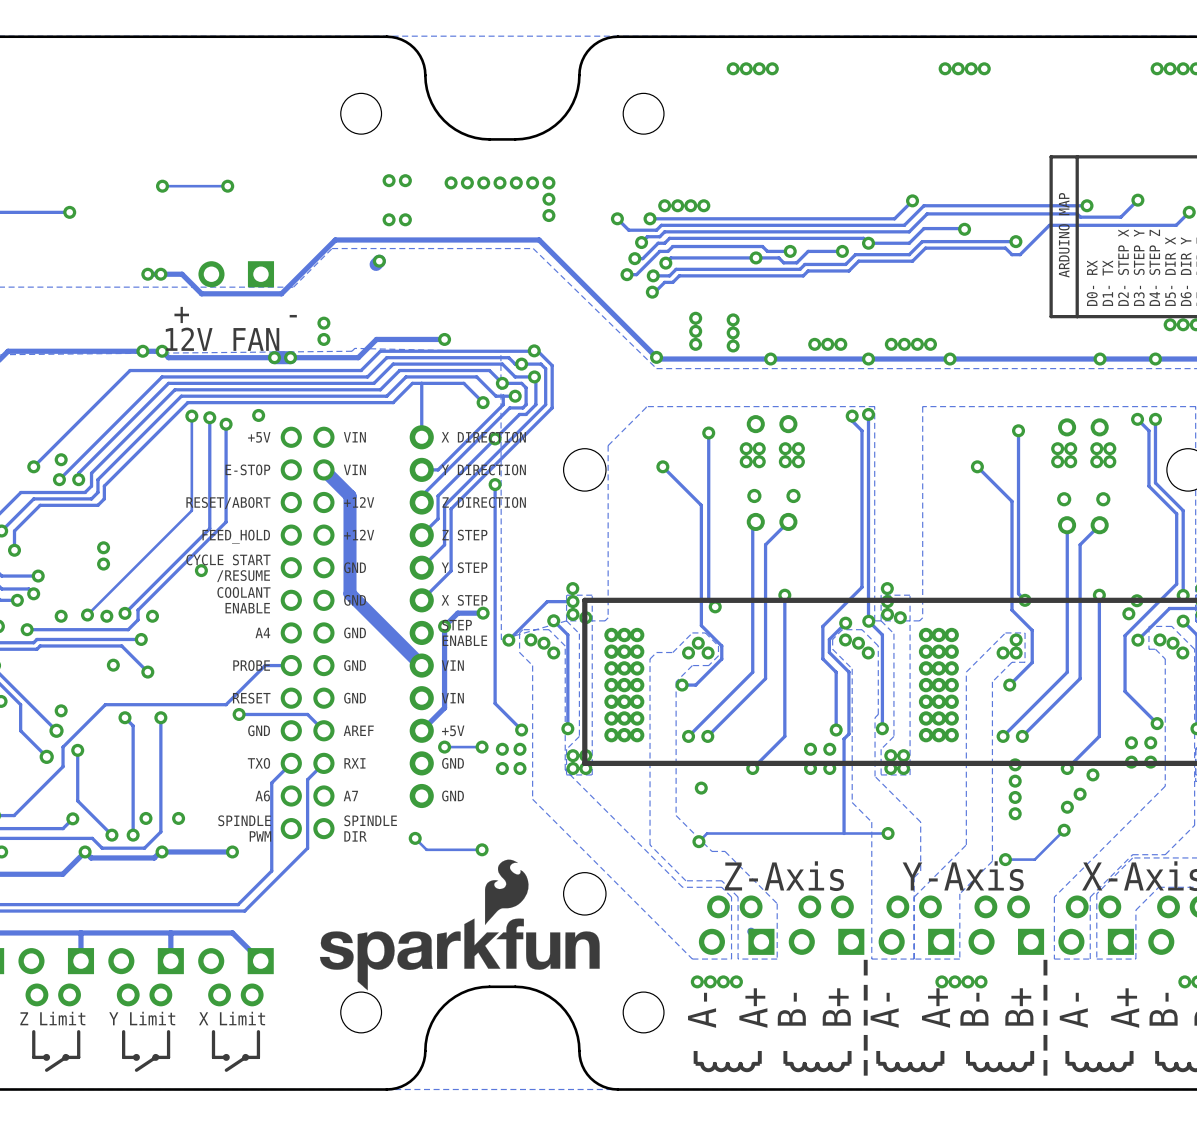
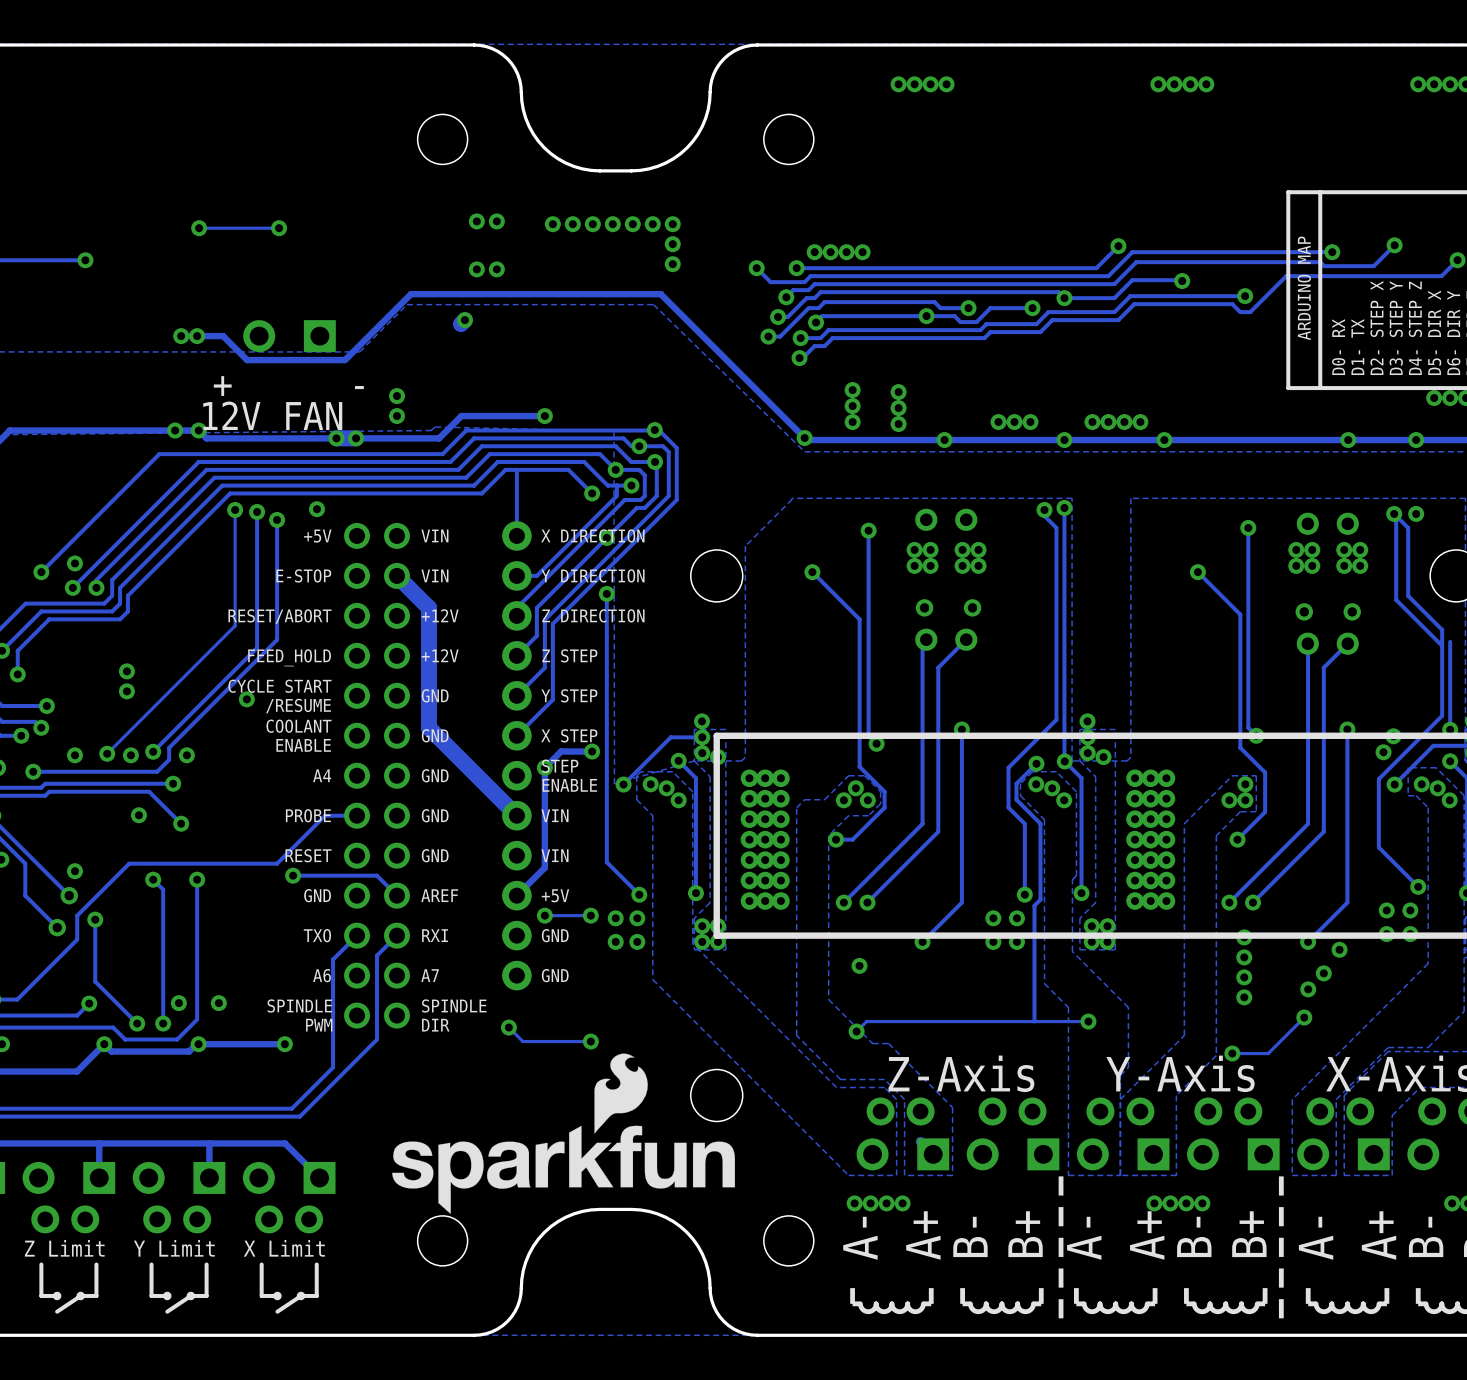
track: (1155, 419) (1155, 482) (1183, 510) (1183, 523) -> none
track: none -> (1396, 515) (1396, 599) (1442, 645)

